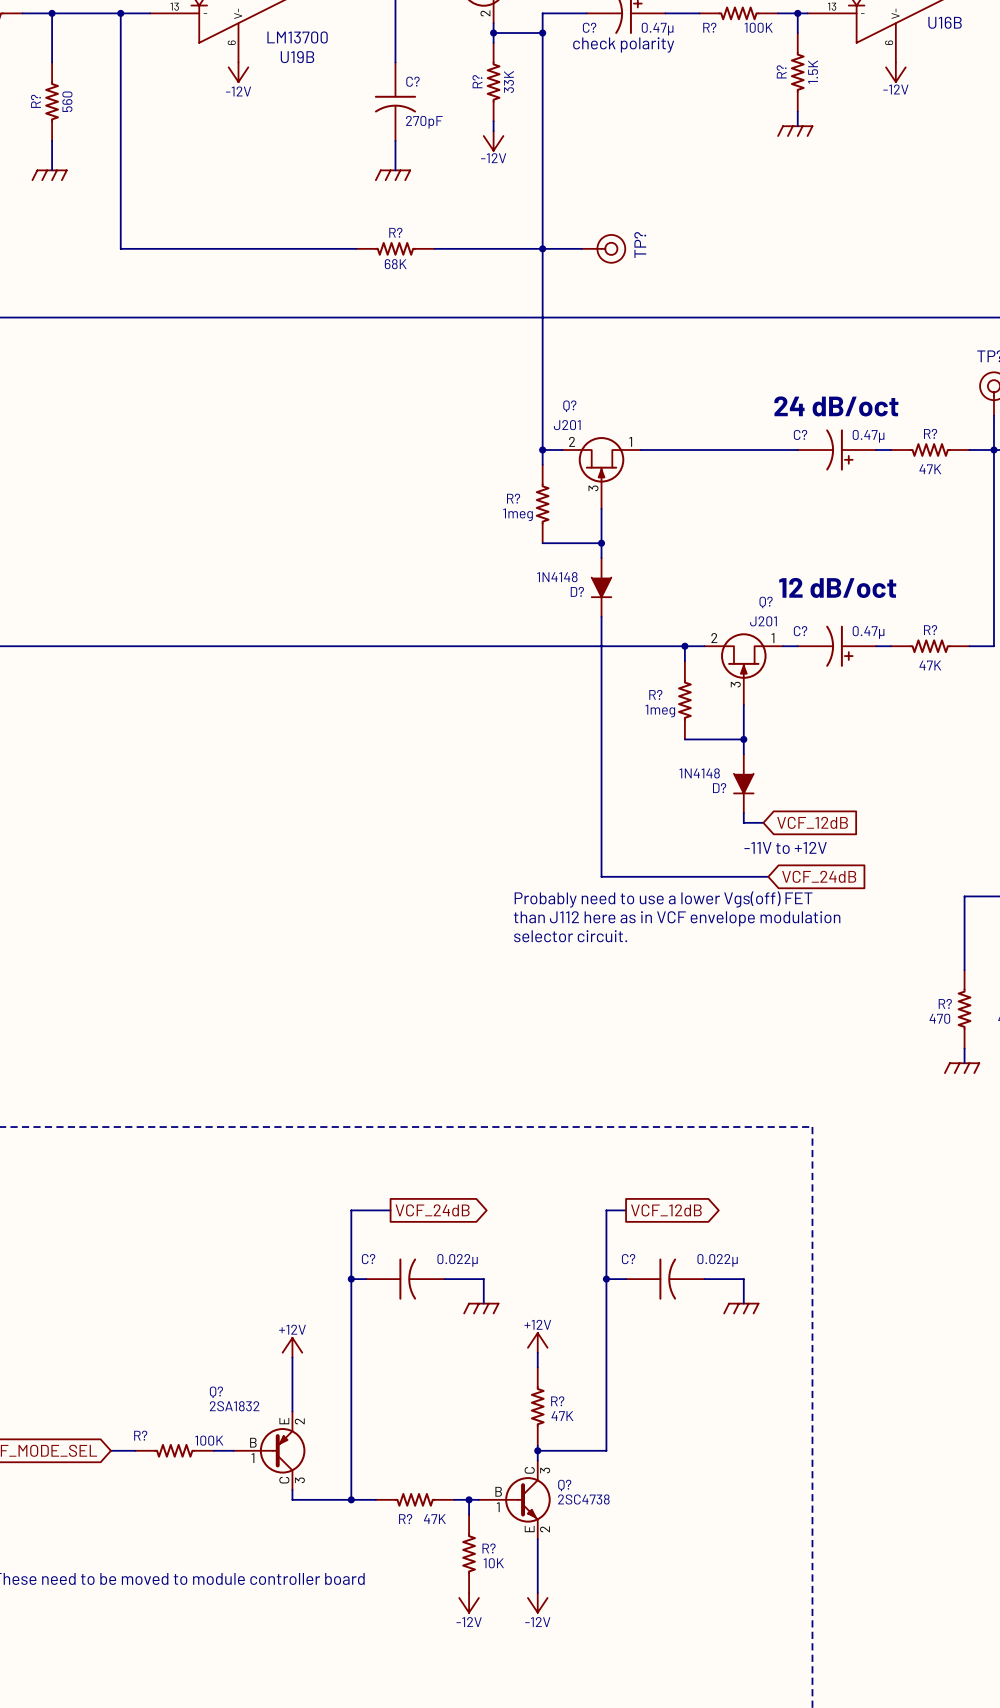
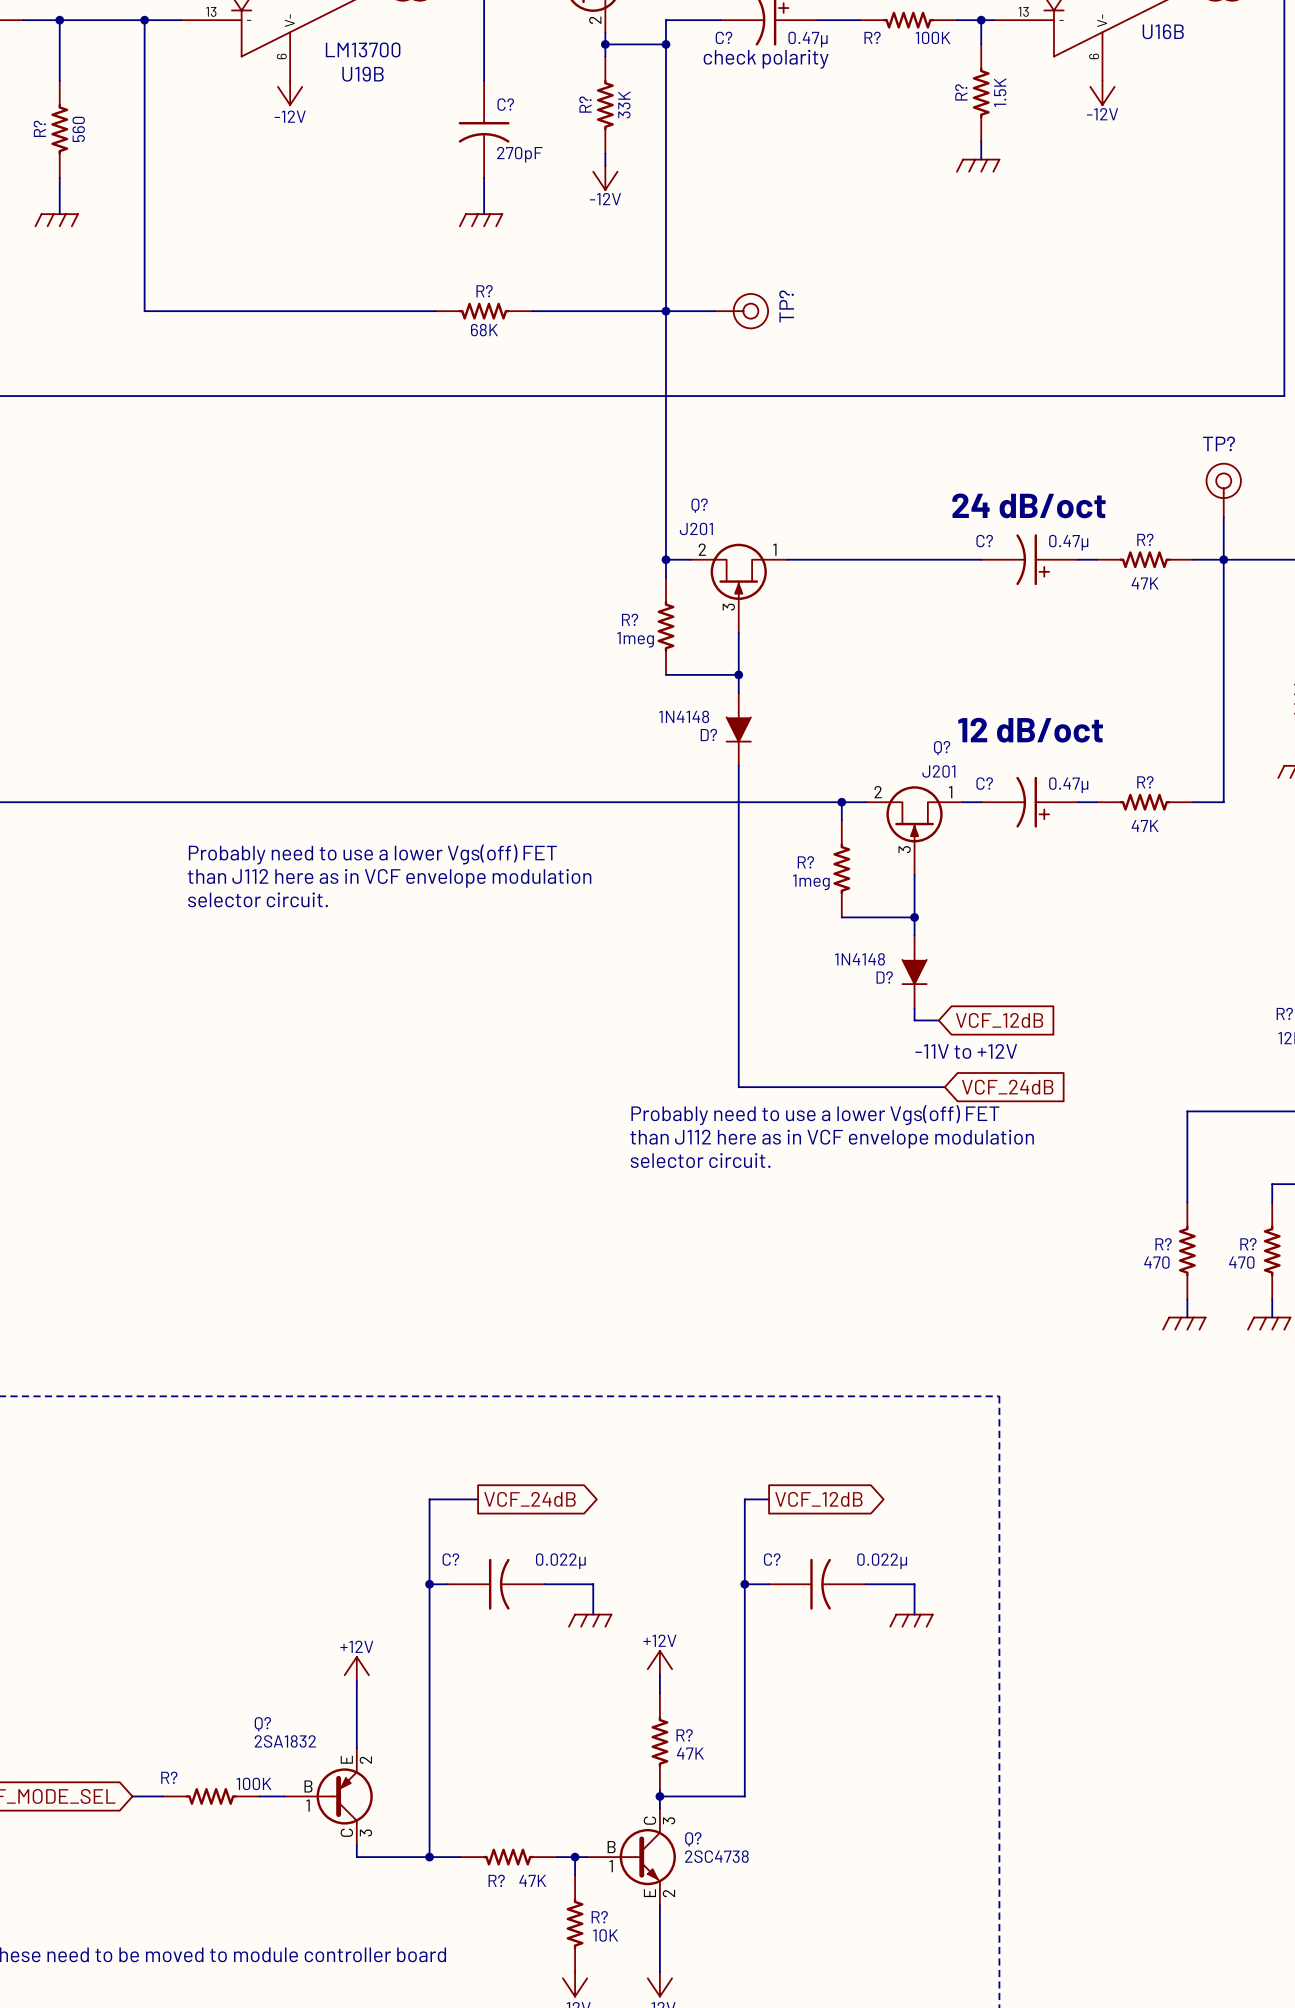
text: none -> Probably need to use a lower Vgs(off) FET (372, 854)
text: none -> than J112 here as in VCF envelope modulation (389, 878)
text: none -> selector circuit. (258, 899)

